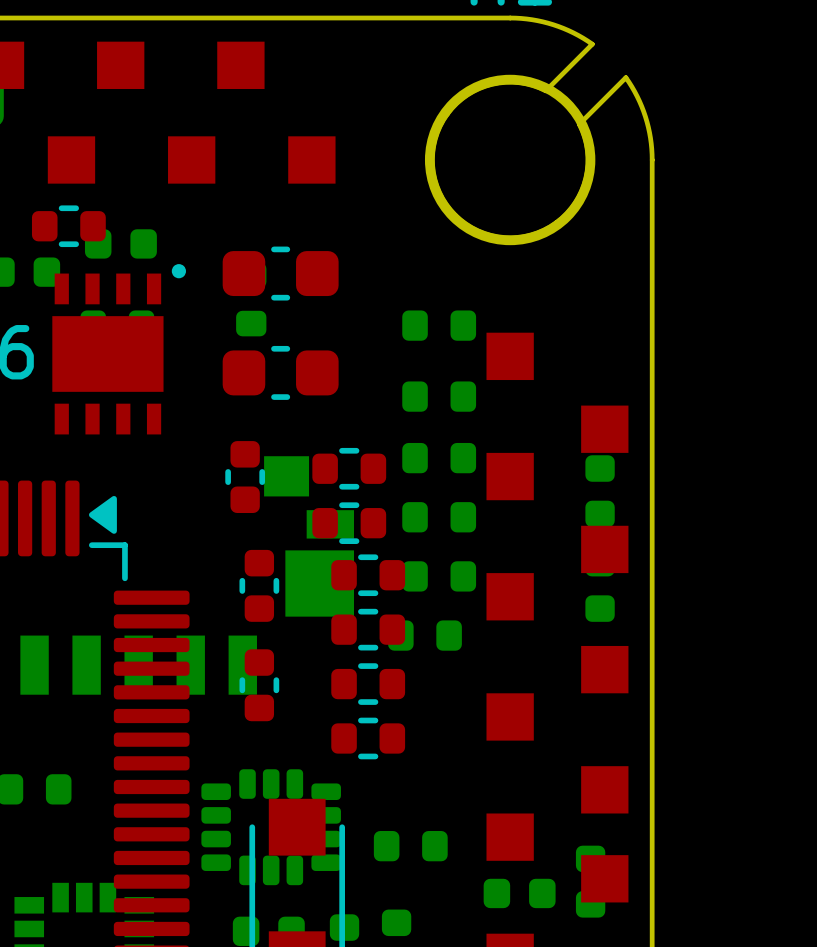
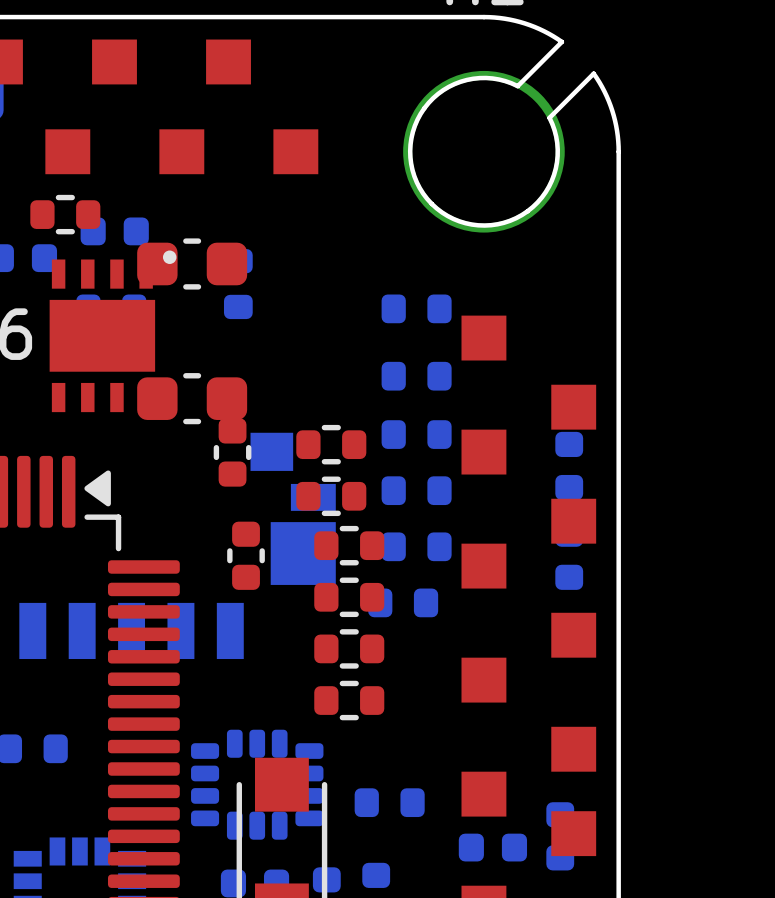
part: (280, 273) -> none
part: none -> (192, 263)
part: (280, 372) -> none
part: none -> (192, 398)
part: (259, 685) -> none

